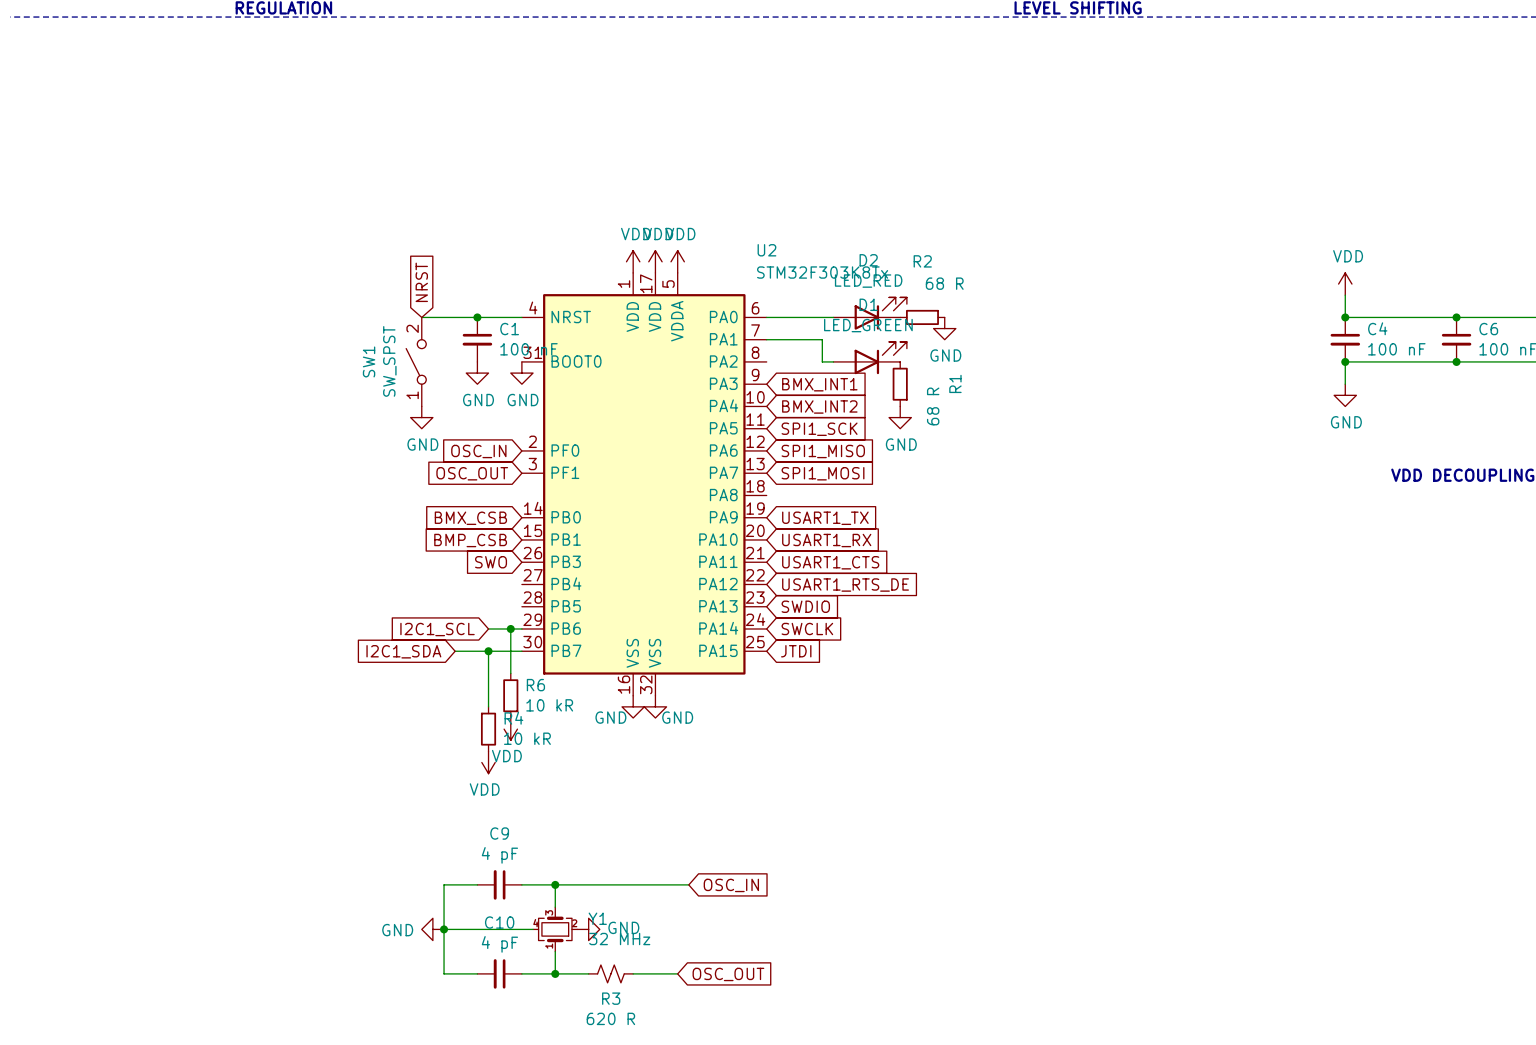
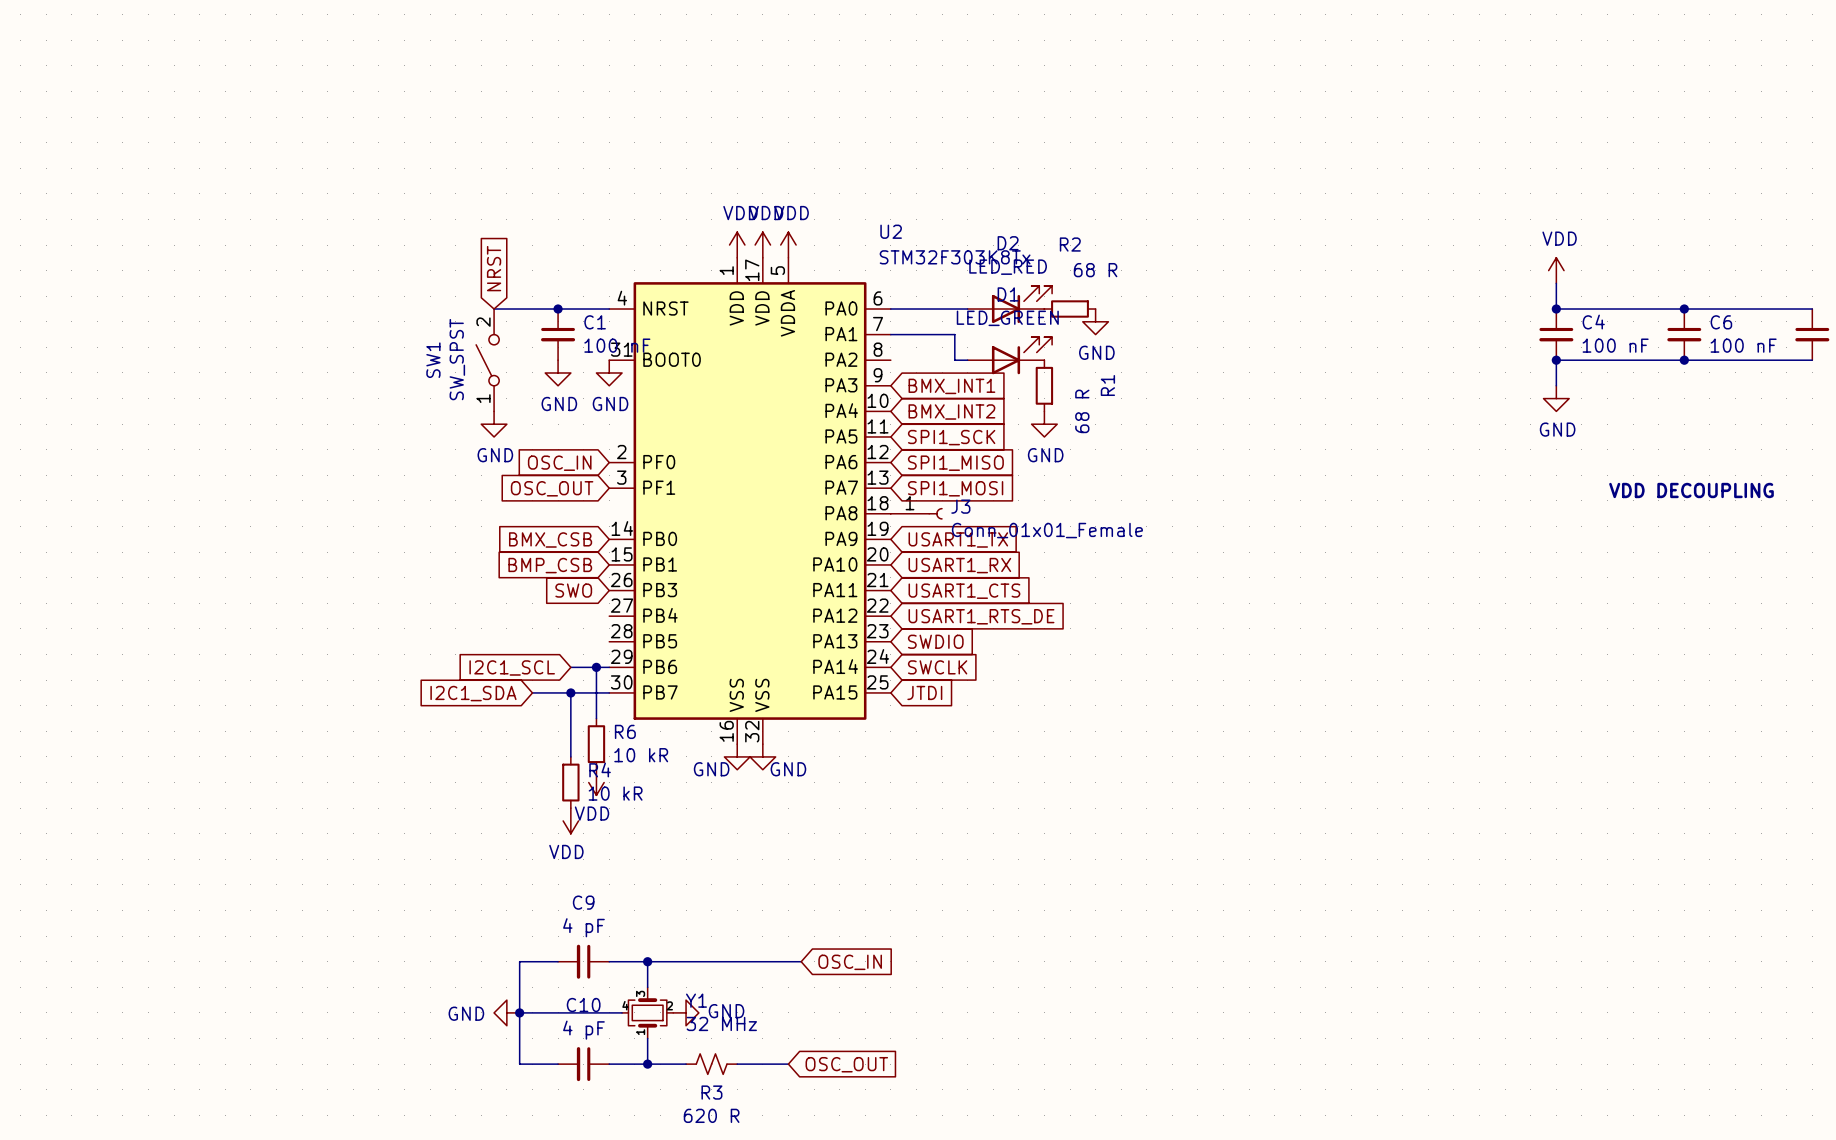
J3: none -> Conn_01x01_Female (916, 513)

